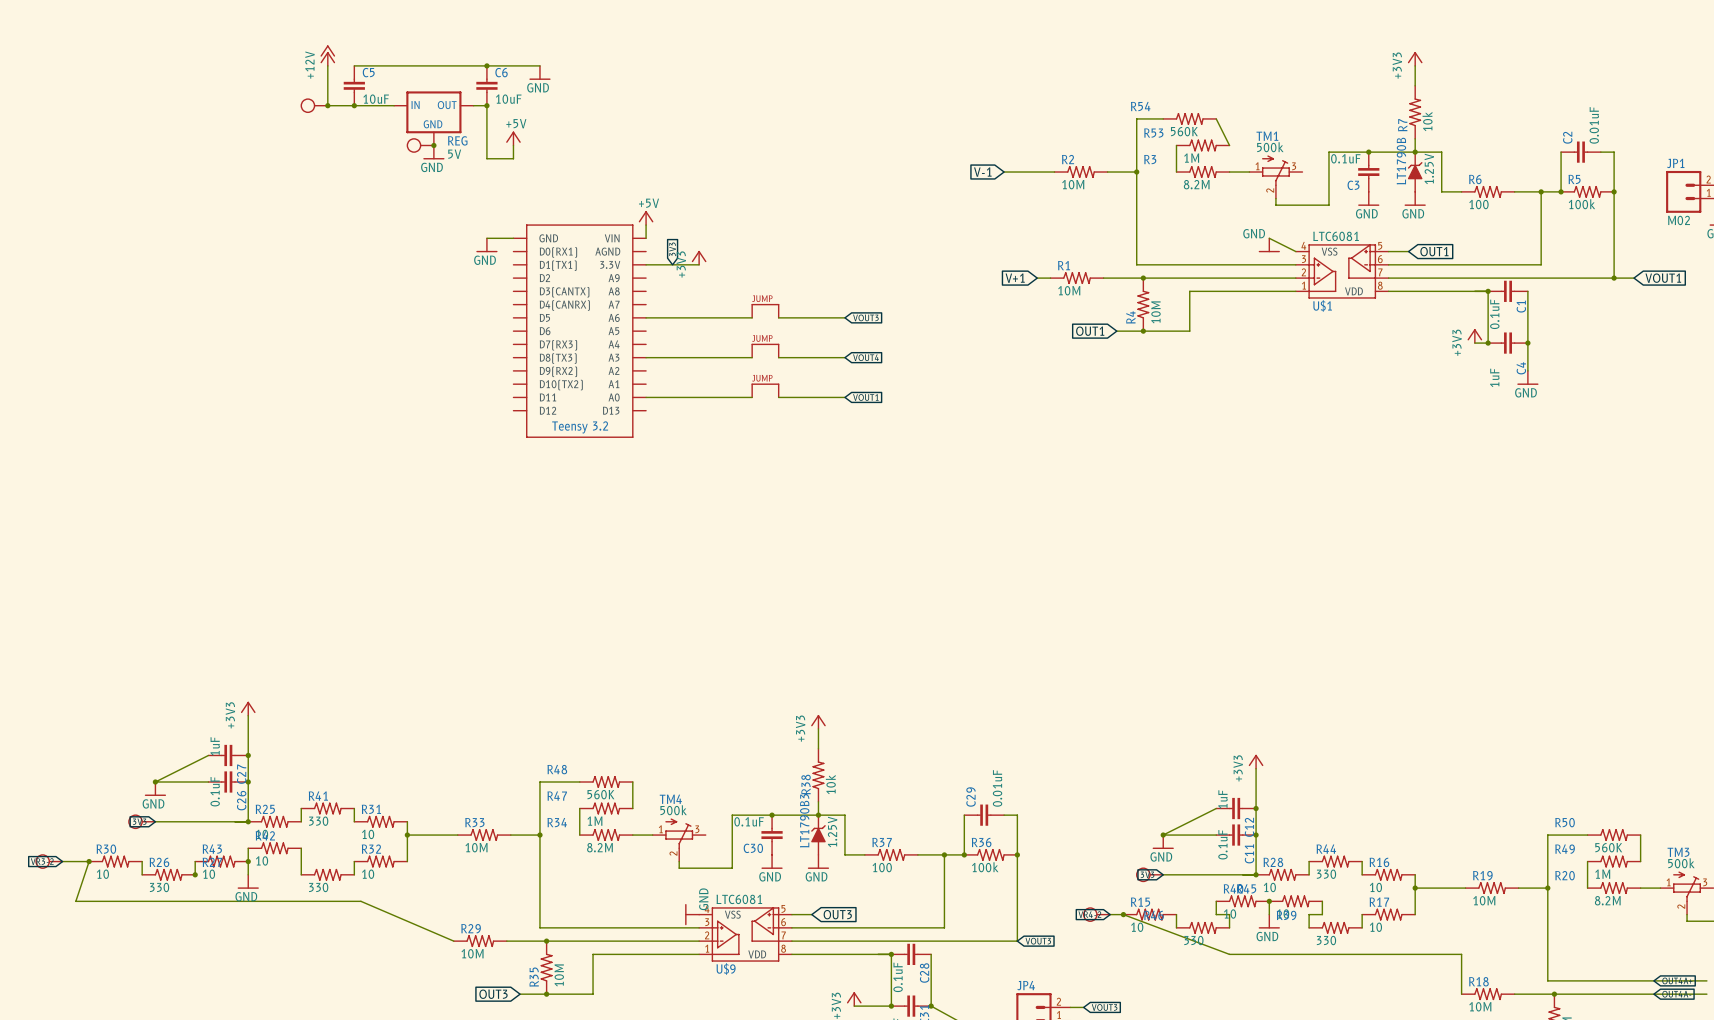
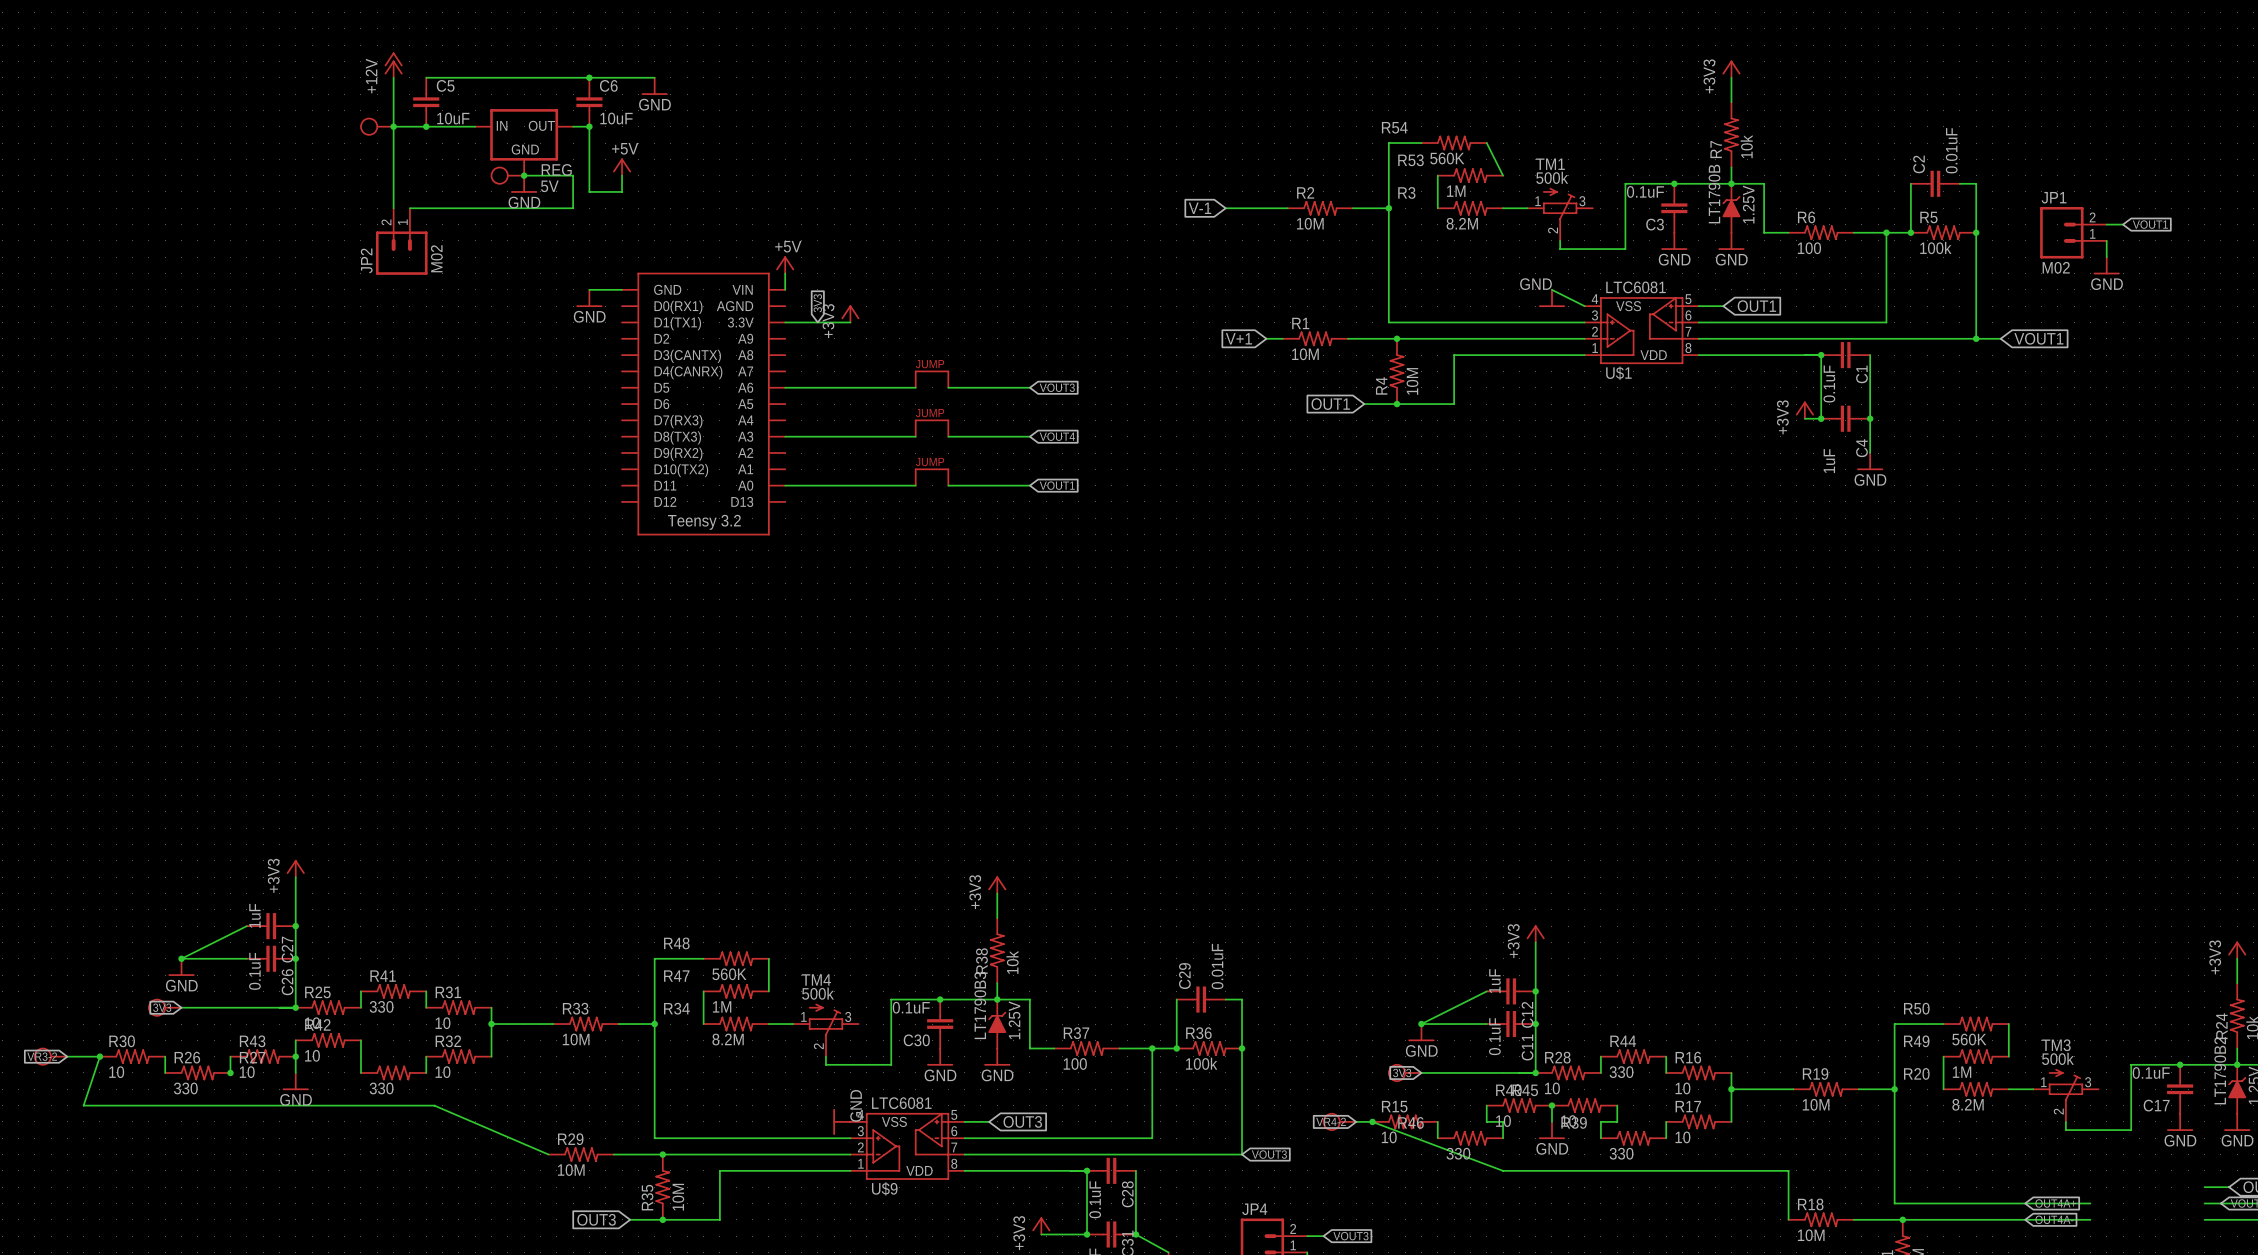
wire: none -> (393, 126) (393, 208)
wire: none -> (524, 175) (573, 175) (573, 208) (409, 208)
JP2: none -> M02 (401, 241)

